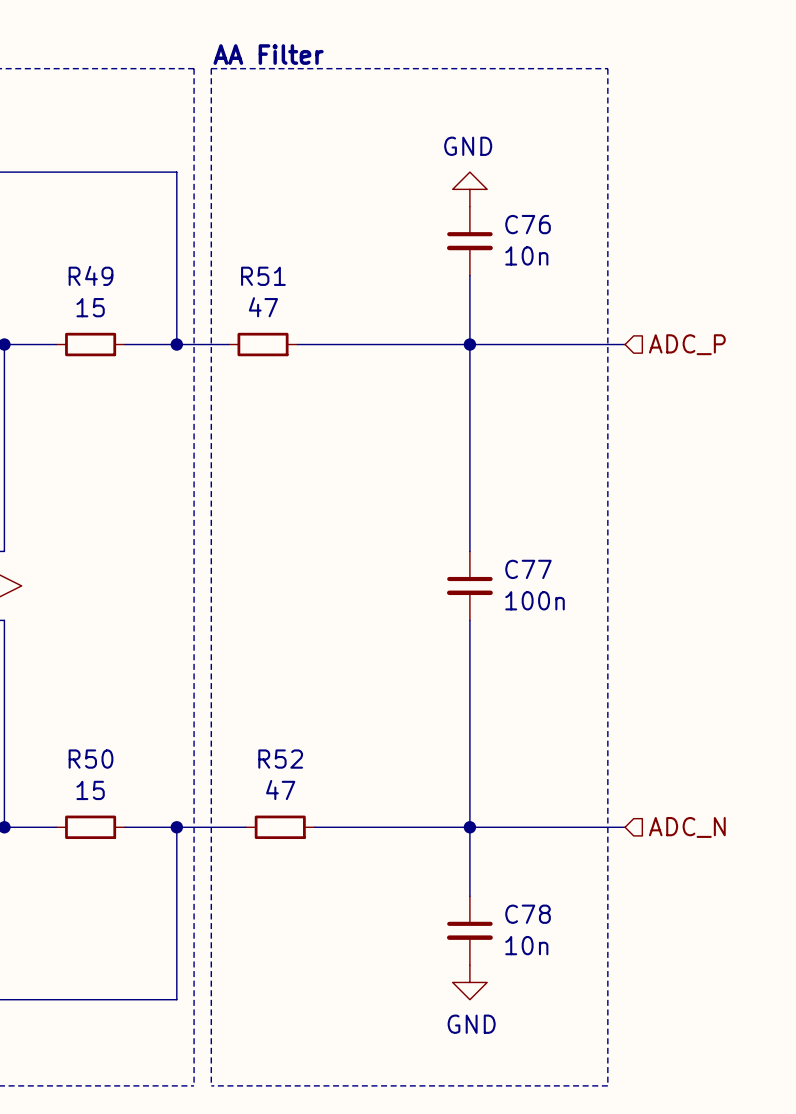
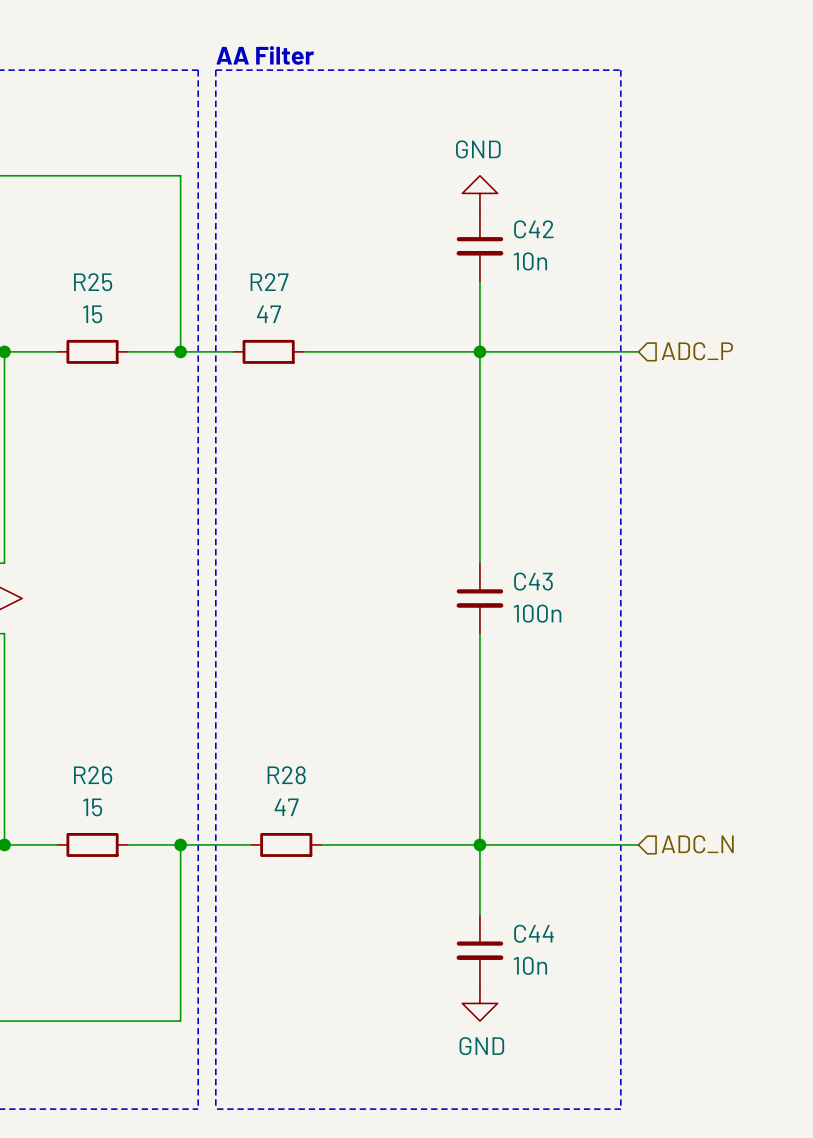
C76 name: C76 (528, 224) -> C42 (533, 229)
R49 name: R49 (91, 275) -> R25 (93, 282)
R51 name: R51 (263, 276) -> R27 (269, 282)
C77 name: C77 (528, 569) -> C43 (533, 581)
R50 name: R50 (91, 759) -> R26 (93, 775)
R52 name: R52 (280, 759) -> R28 (286, 775)
C78 name: C78 (528, 914) -> C44 (534, 933)

